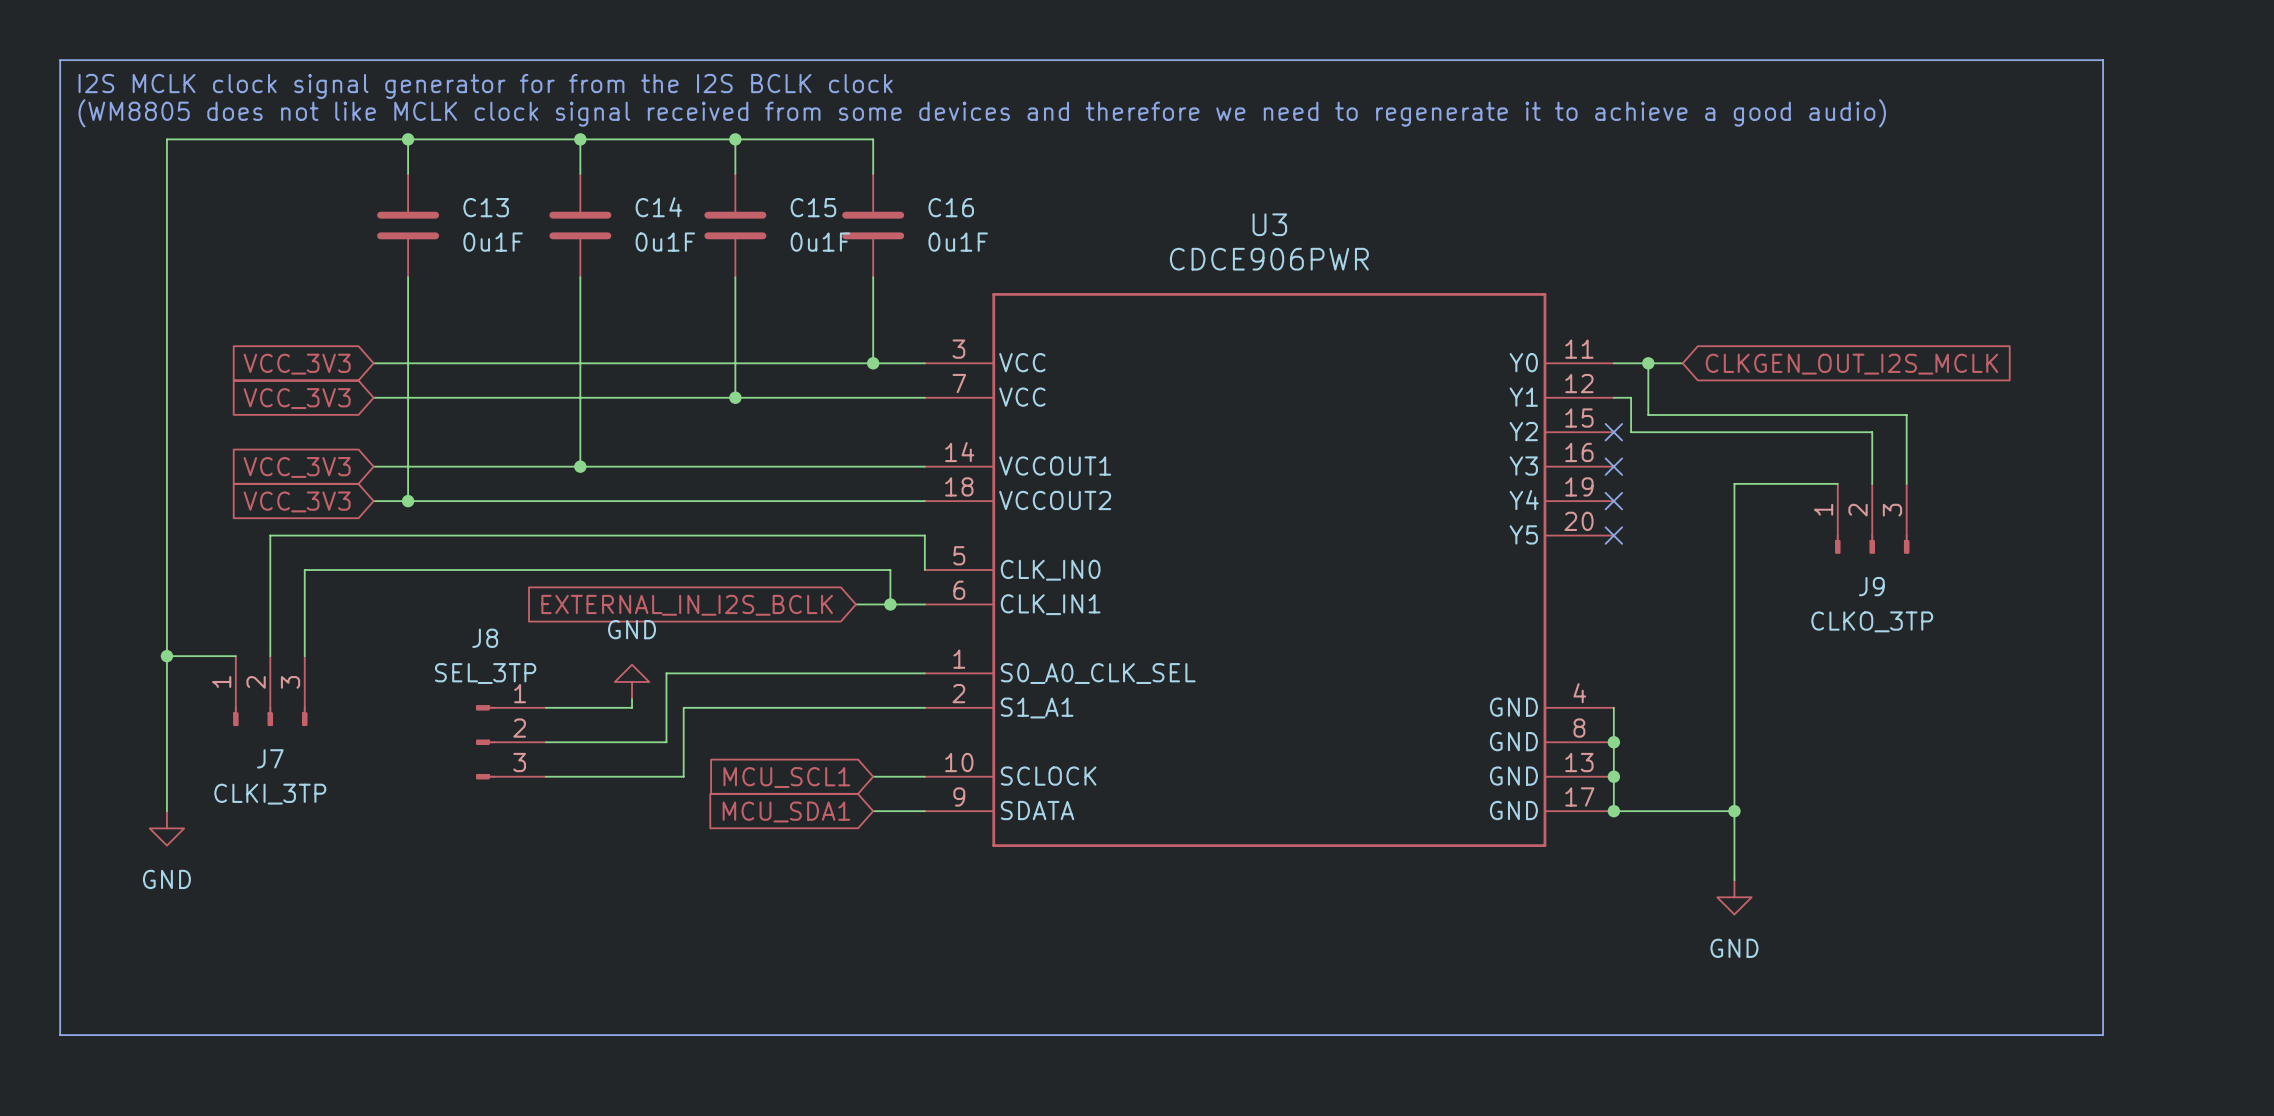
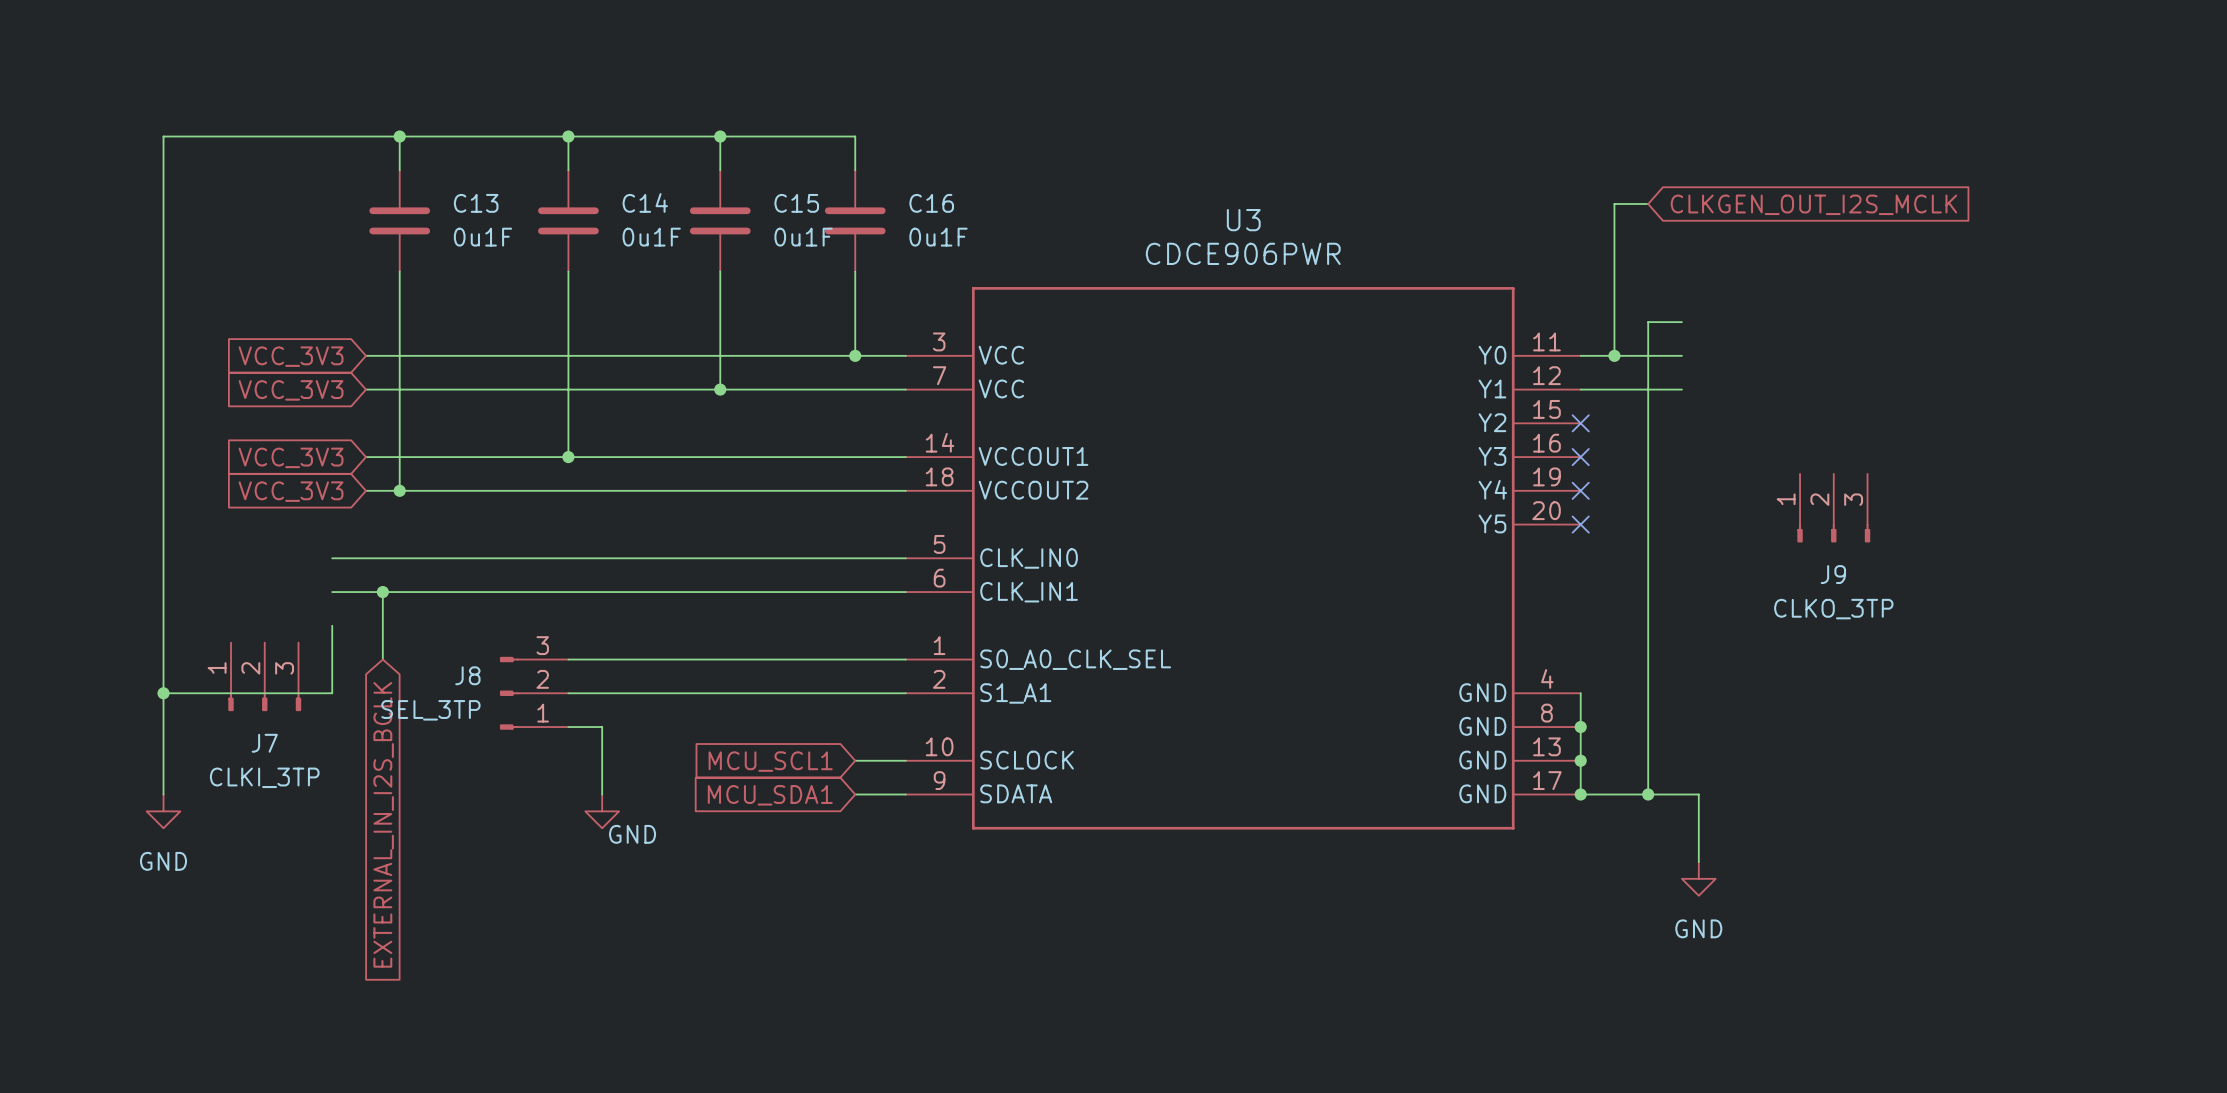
line: (60, 60) (2103, 60) (2103, 1035) (60, 1035) (60, 60) -> none
text: I2S MCLK clock signal generator for from the I2S BCLK clock (485, 86) -> none
text: (WM8805 does not like MCLK clock signal received from some devices and therefore we need to regenerate it to achieve a good audio) (982, 113) -> none
wire: none -> (1681, 322) (1648, 322) (1648, 794)
wire: (1648, 363) (1648, 414) (1906, 414) (1906, 483) -> (1614, 355) (1614, 204) (1648, 204)
wire: none -> (1648, 355) (1681, 355)
global label position: CLKGEN_OUT_I2S_MCLK (1851, 364) -> CLKGEN_OUT_I2S_MCLK (1813, 204)
wire: (1631, 397) (1631, 432) (1872, 432) (1872, 483) -> (1597, 389) (1681, 389)
wire: (1837, 483) (1734, 483) (1734, 811) -> none
wire: (339, 570) (304, 570) (304, 656) -> none
wire: (890, 570) (890, 604) -> (872, 558) (905, 558)
wire: (924, 570) (924, 535) (270, 535) (270, 656) -> none
wire: none -> (332, 592) (838, 592)
wire: none -> (382, 592) (382, 659)
junction: none -> (382, 592)
junction: (890, 604) -> none
global label: EXTERNAL_IN_I2S_BCLK (687, 605) -> none
power symbol text position: GND (632, 629) -> GND (632, 834)
wire: none -> (332, 625) (332, 693) (163, 693)
J8 name position: J8 (485, 638) -> J8 (467, 675)
wire: (166, 656) (235, 656) -> none
junction position: (166, 656) -> (163, 693)
J8 value position: SEL_3TP (485, 673) -> SEL_3TP (430, 710)
wire: (666, 673) (666, 742) (614, 742) -> (652, 659) (568, 659)
power symbol rotation: 0° (632, 681) -> 180° (602, 811)
power symbol position: GND (632, 681) -> GND (602, 811)
wire: (632, 699) (632, 707) -> (669, 693) (619, 693)
wire: (683, 707) (683, 776) (545, 776) -> none
J8 flip: as is (485, 742) -> up-down (509, 693)
J8 position: (510, 742) -> (534, 693)
wire: none -> (602, 727) (602, 794)
junction position: (1734, 811) -> (1648, 794)
global label: none -> EXTERNAL_IN_I2S_BCLK (383, 824)

